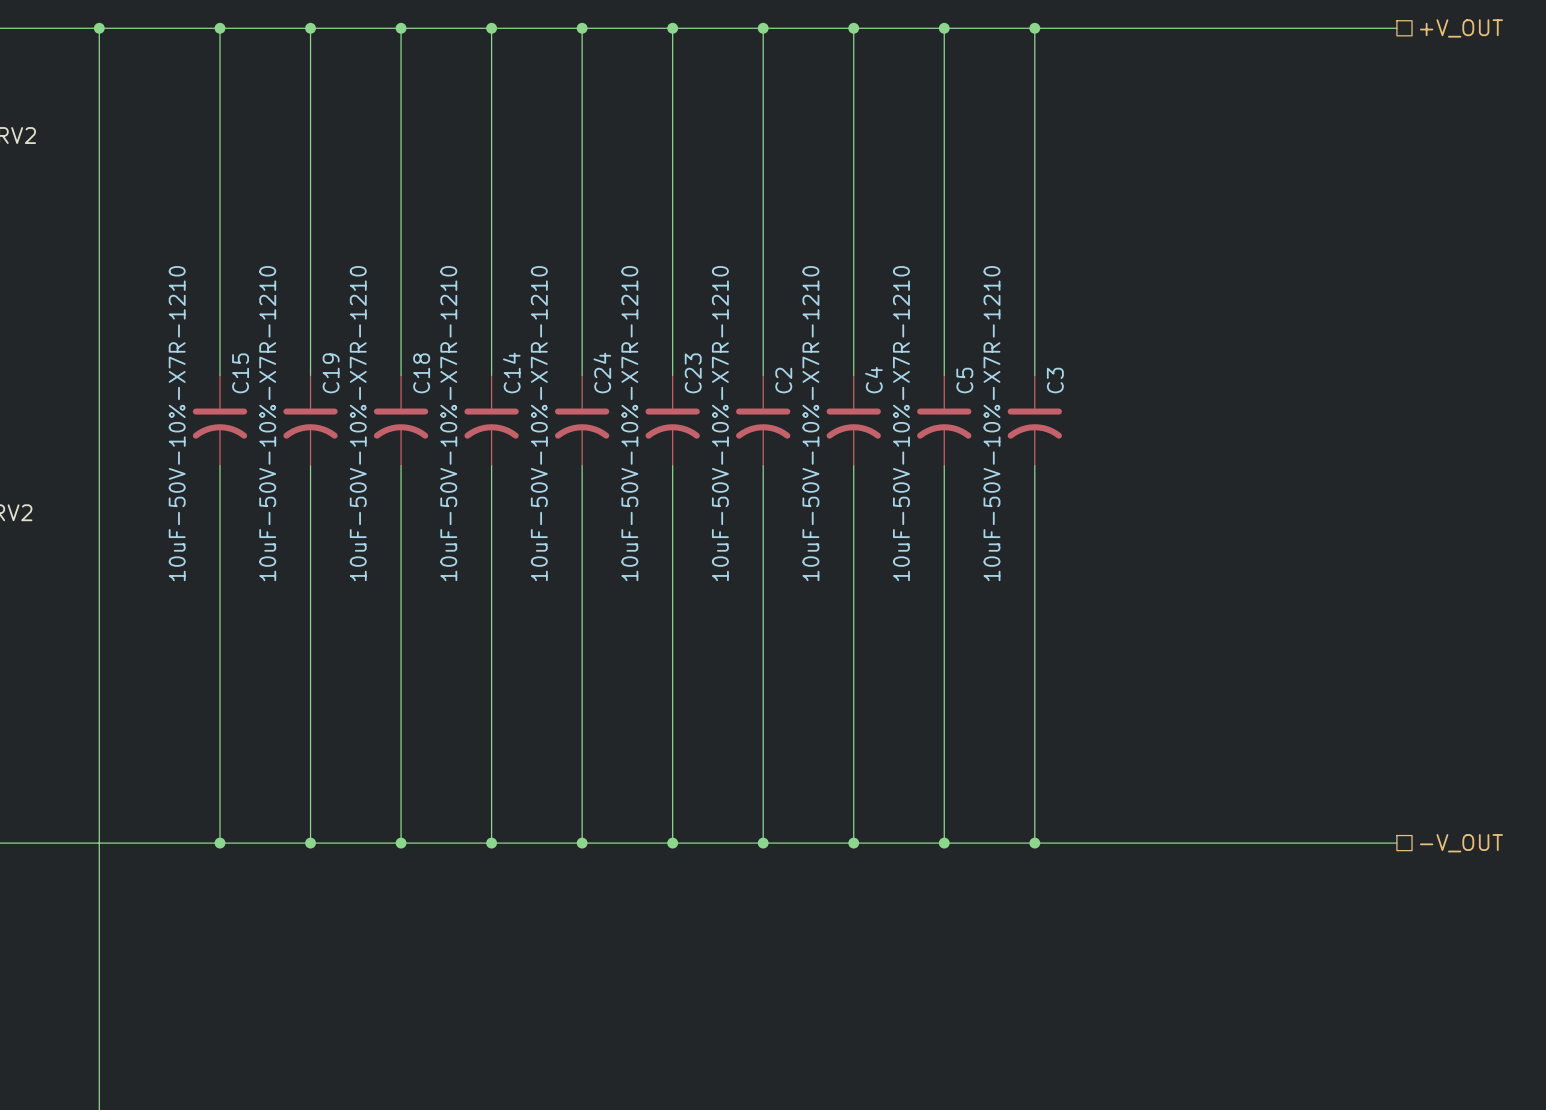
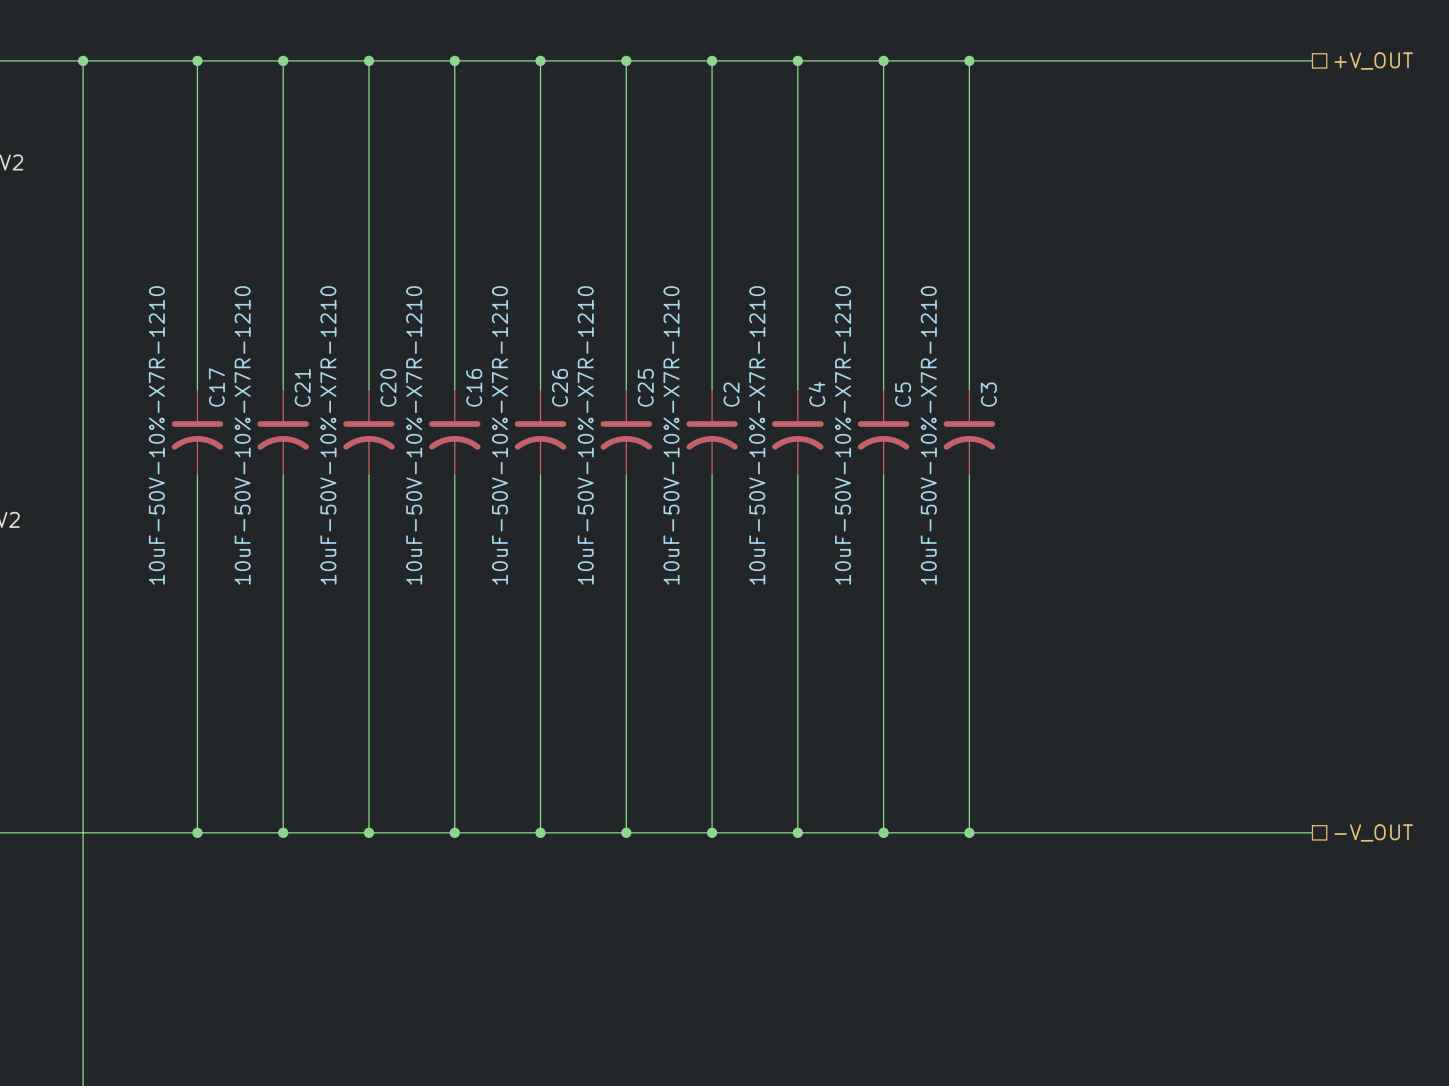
C14 name: C14 (511, 372) -> C16 (474, 387)
C24 name: C24 (602, 372) -> C26 (560, 387)
C15 name: C15 (240, 373) -> C17 (216, 387)
C19 name: C19 (331, 373) -> C21 (302, 387)
C18 name: C18 (421, 373) -> C20 (388, 387)
C23 name: C23 (693, 373) -> C25 (645, 387)

